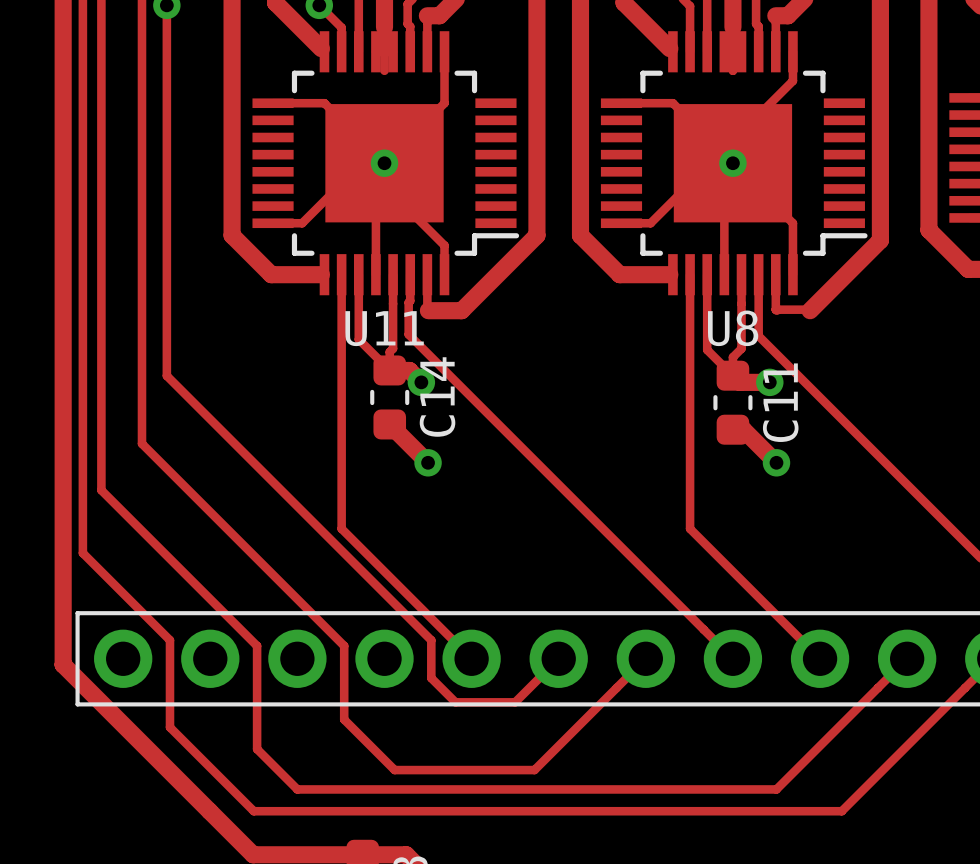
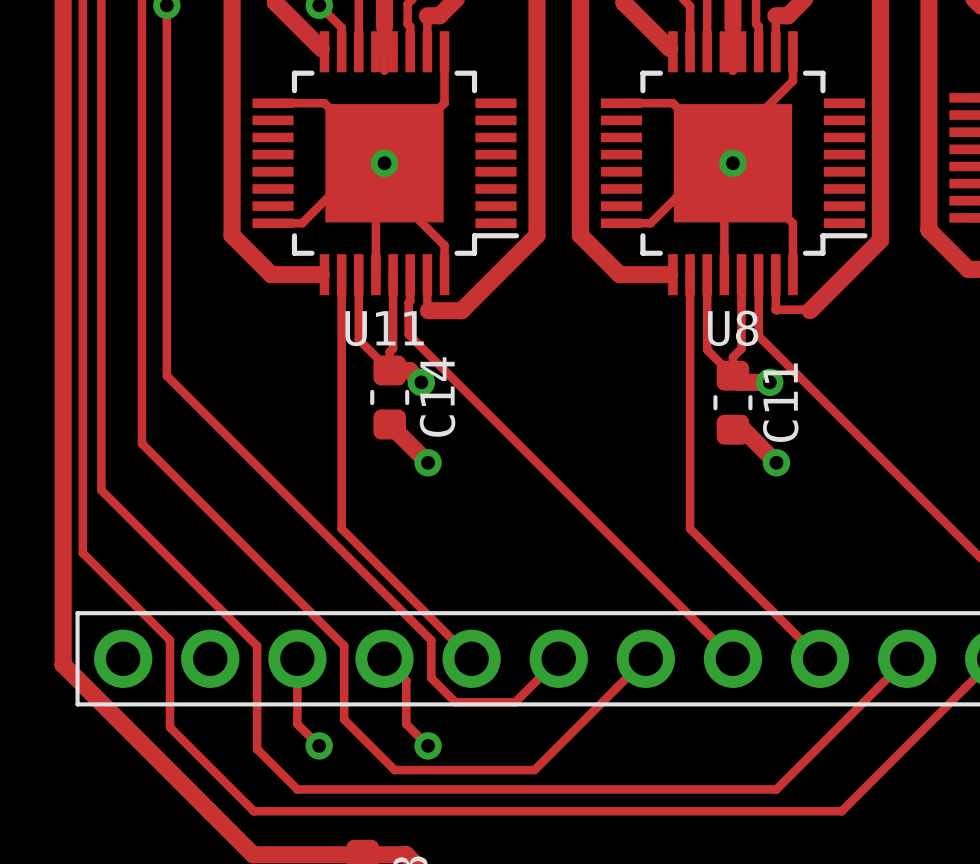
track: none -> (297, 658) (297, 724) (319, 745)
track: none -> (384, 658) (406, 680) (406, 724) (428, 745)
via: none -> (319, 745)
via: none -> (428, 745)

